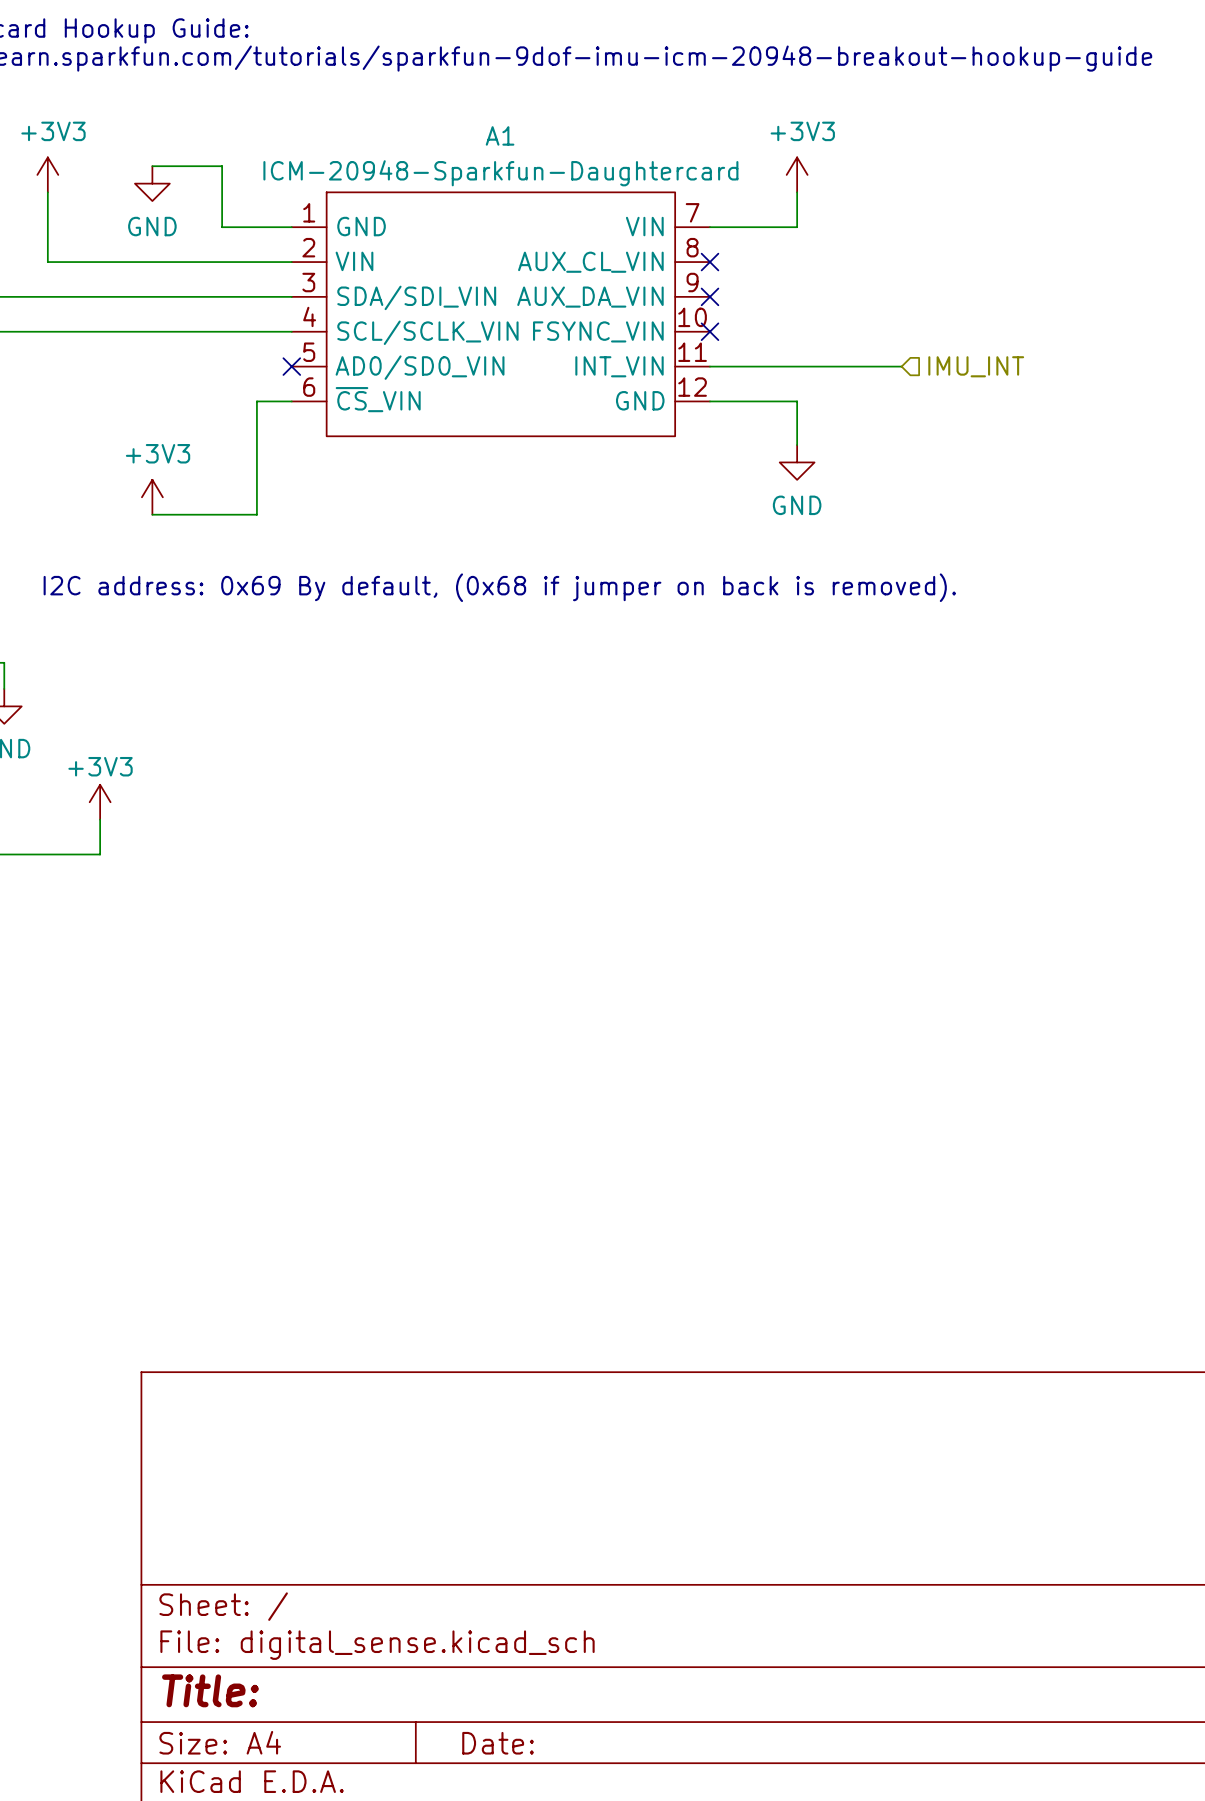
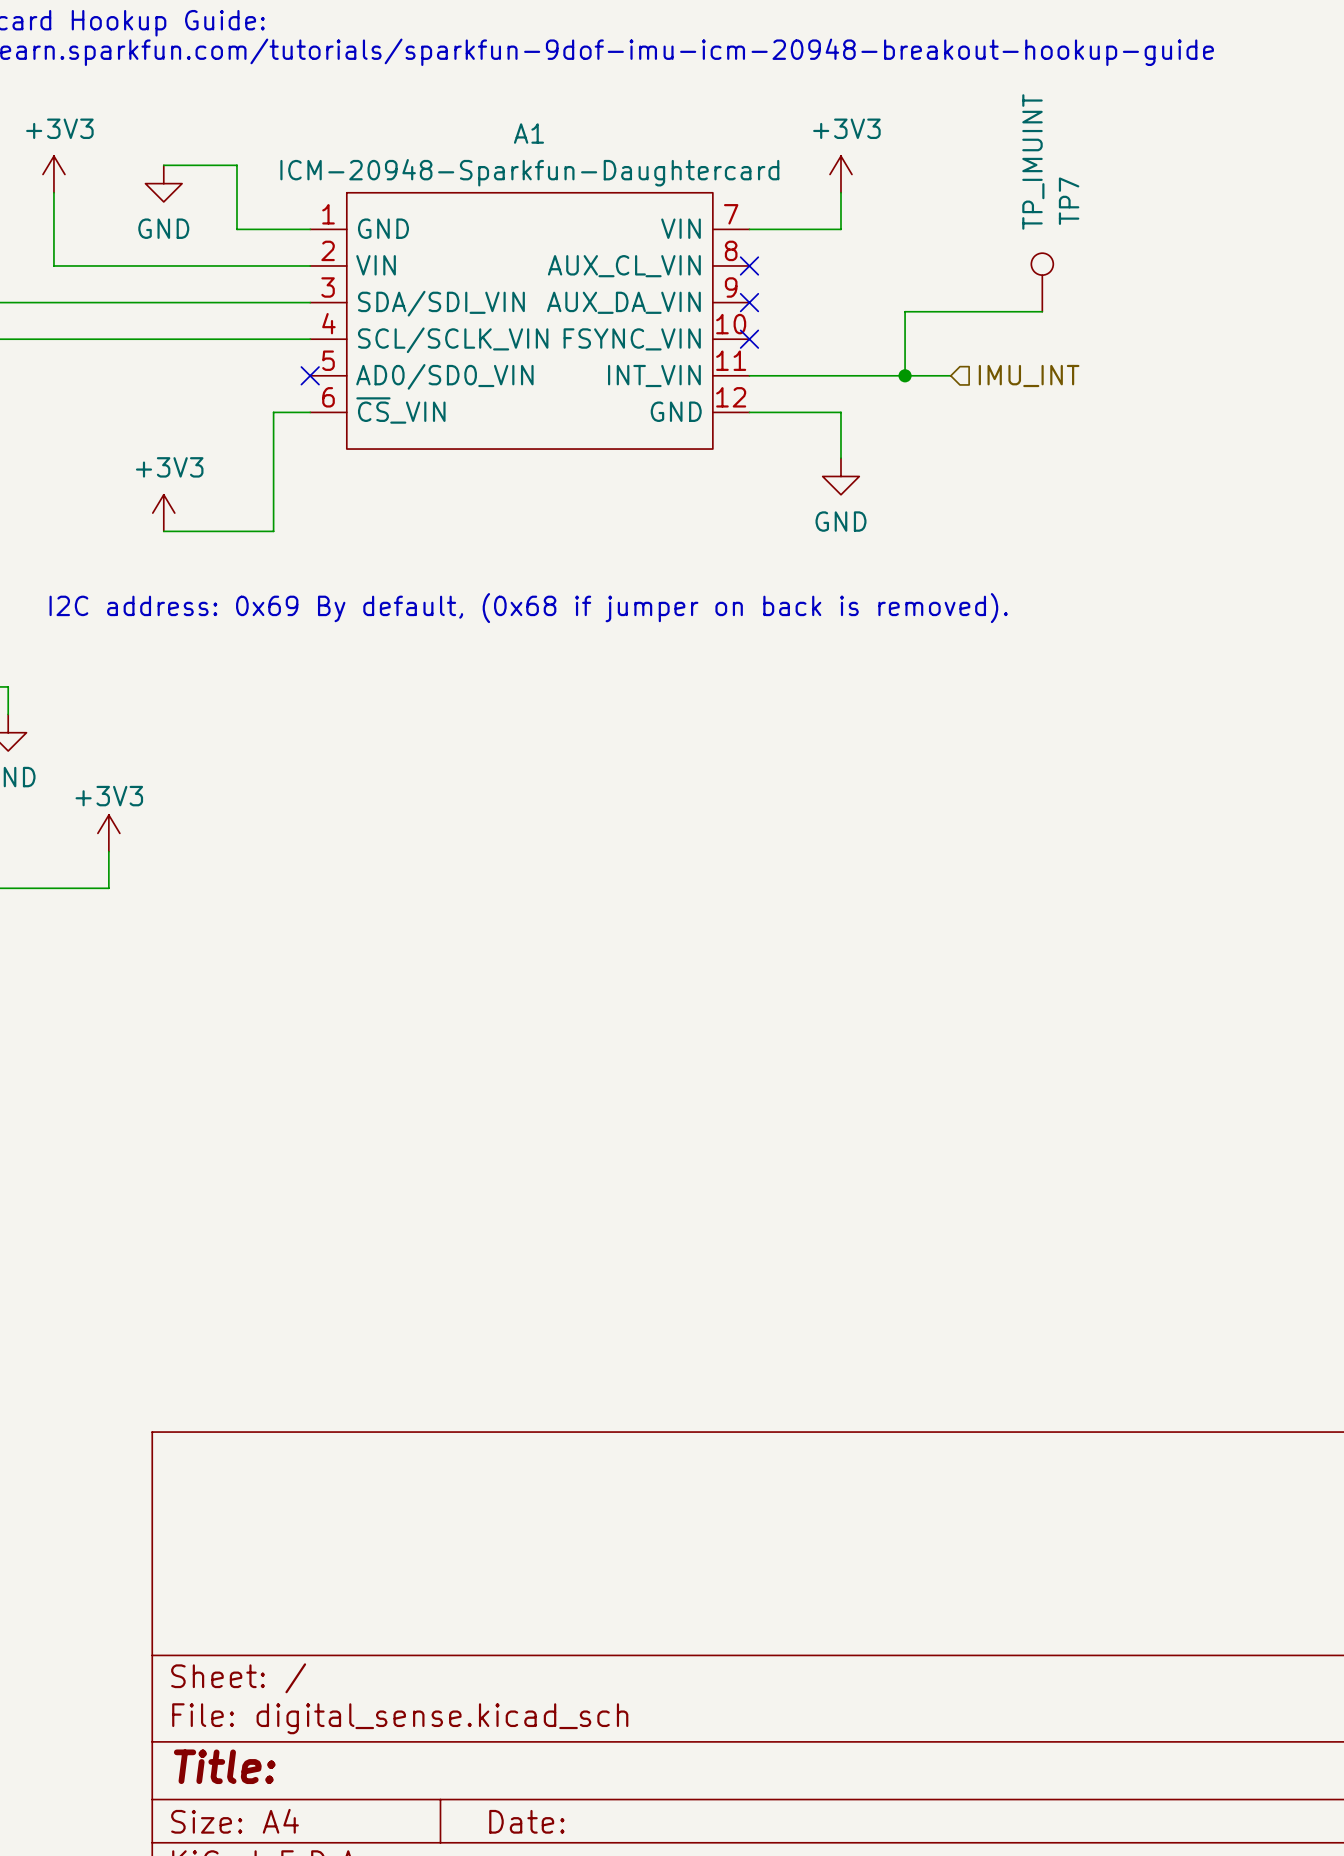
TP7: none -> TP_IMUINT (1042, 282)
wire: none -> (1042, 311) (905, 311) (905, 375)
junction: none -> (905, 375)

